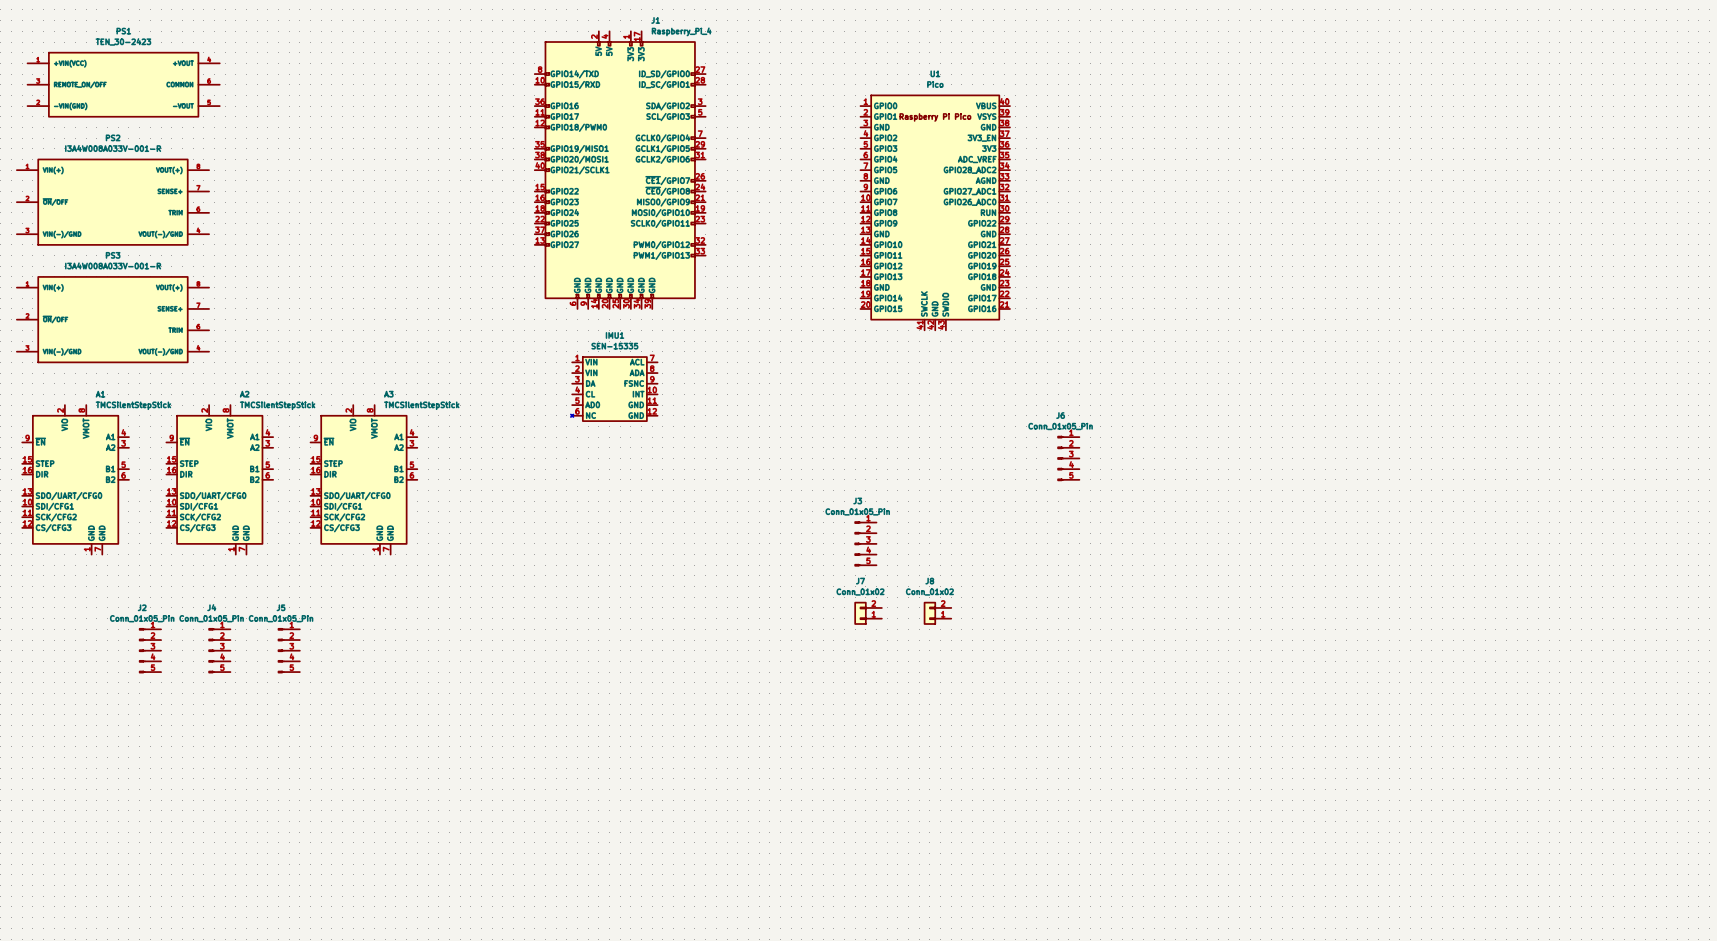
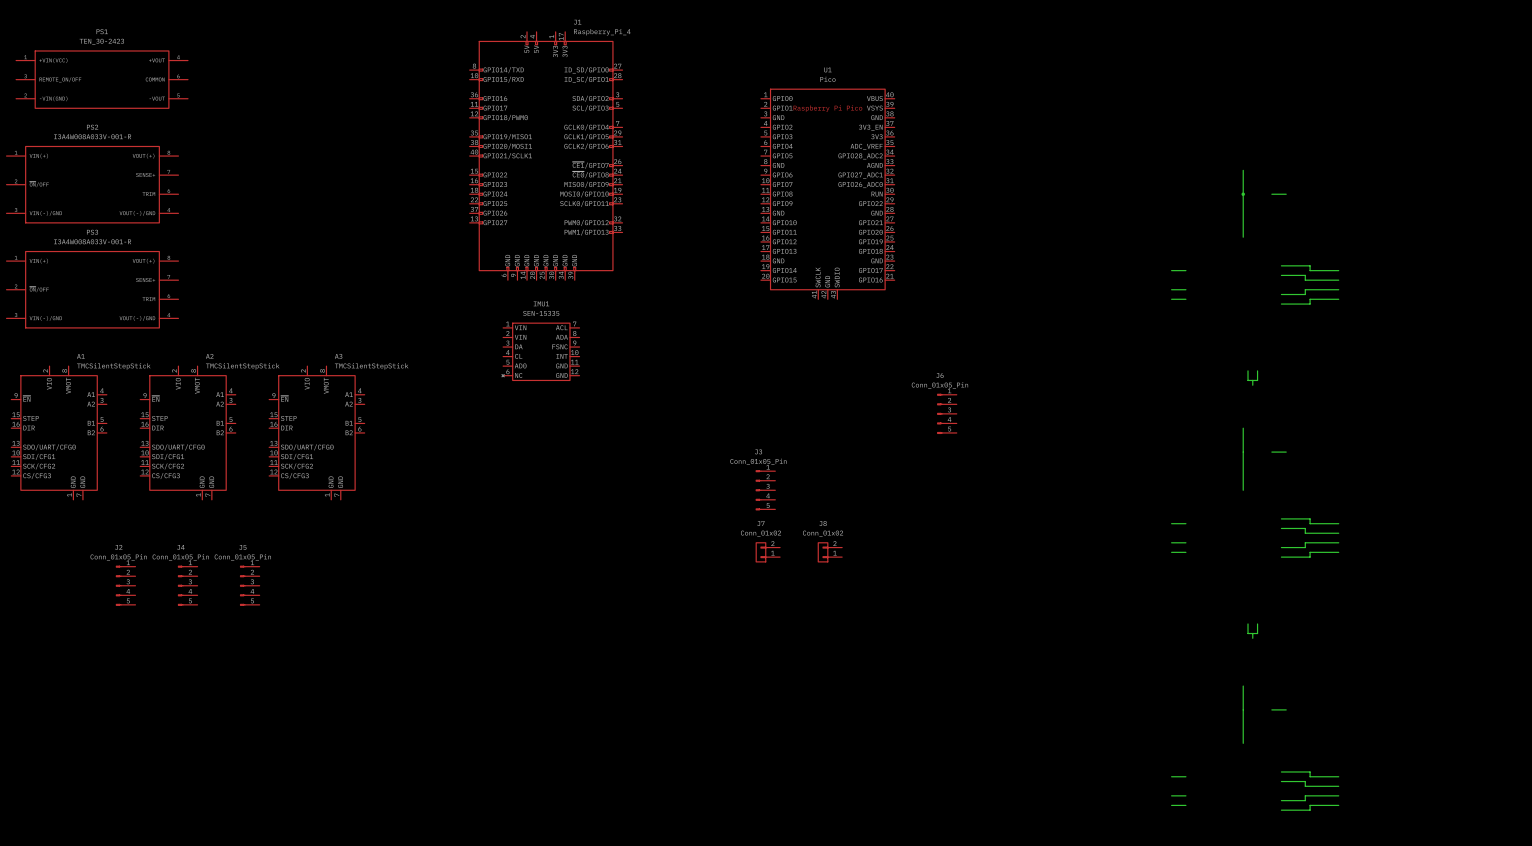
wire: none -> (1243, 170) (1243, 237)
junction: none -> (1243, 194)
wire: none -> (1271, 194) (1286, 194)
wire: none -> (1281, 265) (1310, 265) (1310, 270) (1338, 270)
wire: none -> (1171, 270) (1185, 270)
wire: none -> (1281, 275) (1305, 275) (1305, 280) (1338, 280)
wire: none -> (1171, 289) (1185, 289)
wire: none -> (1338, 289) (1305, 289) (1305, 294) (1281, 294)
wire: none -> (1171, 299) (1185, 299)
wire: none -> (1338, 299) (1310, 299) (1310, 304) (1281, 304)
wire: none -> (1248, 370) (1248, 380) (1257, 380) (1257, 370)
wire: none -> (1252, 380) (1252, 385)
wire: none -> (1243, 428) (1243, 490)
wire: none -> (1271, 452) (1286, 452)
wire: none -> (1281, 518) (1310, 518) (1310, 523) (1338, 523)
wire: none -> (1171, 523) (1185, 523)
wire: none -> (1281, 528) (1305, 528) (1305, 533) (1338, 533)
wire: none -> (1171, 542) (1185, 542)
wire: none -> (1338, 542) (1305, 542) (1305, 547) (1281, 547)
wire: none -> (1171, 552) (1185, 552)
wire: none -> (1338, 552) (1310, 552) (1310, 557) (1281, 557)
wire: none -> (1248, 623) (1248, 633) (1257, 633) (1257, 623)
wire: none -> (1252, 633) (1252, 638)
wire: none -> (1243, 686) (1243, 743)
wire: none -> (1271, 709) (1286, 709)
wire: none -> (1281, 771) (1310, 771) (1310, 776) (1338, 776)
wire: none -> (1171, 776) (1185, 776)
wire: none -> (1281, 781) (1305, 781) (1305, 786) (1338, 786)
wire: none -> (1171, 795) (1185, 795)
wire: none -> (1338, 795) (1305, 795) (1305, 800) (1281, 800)
wire: none -> (1171, 805) (1185, 805)
wire: none -> (1338, 805) (1310, 805) (1310, 810) (1281, 810)

